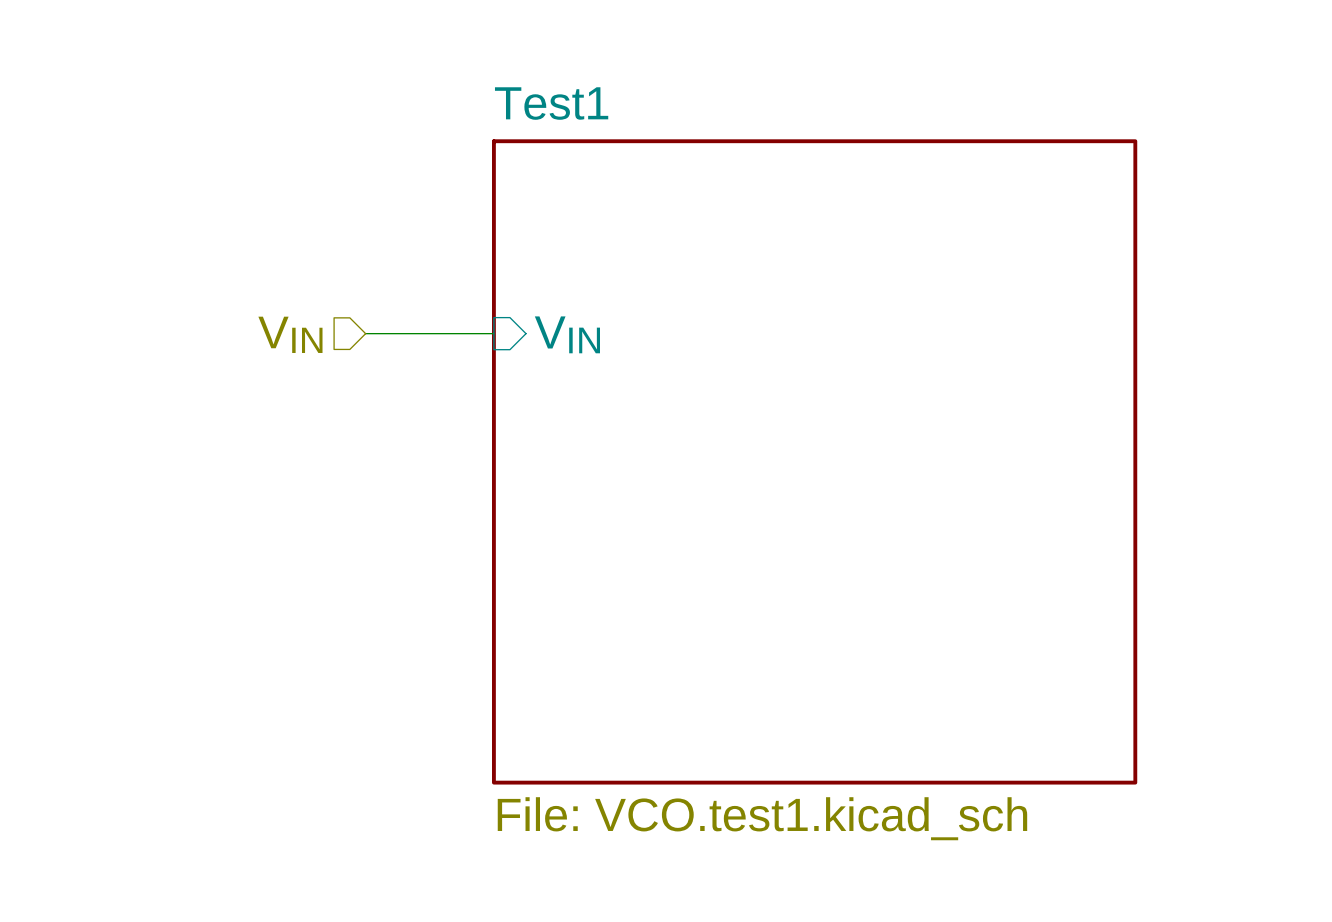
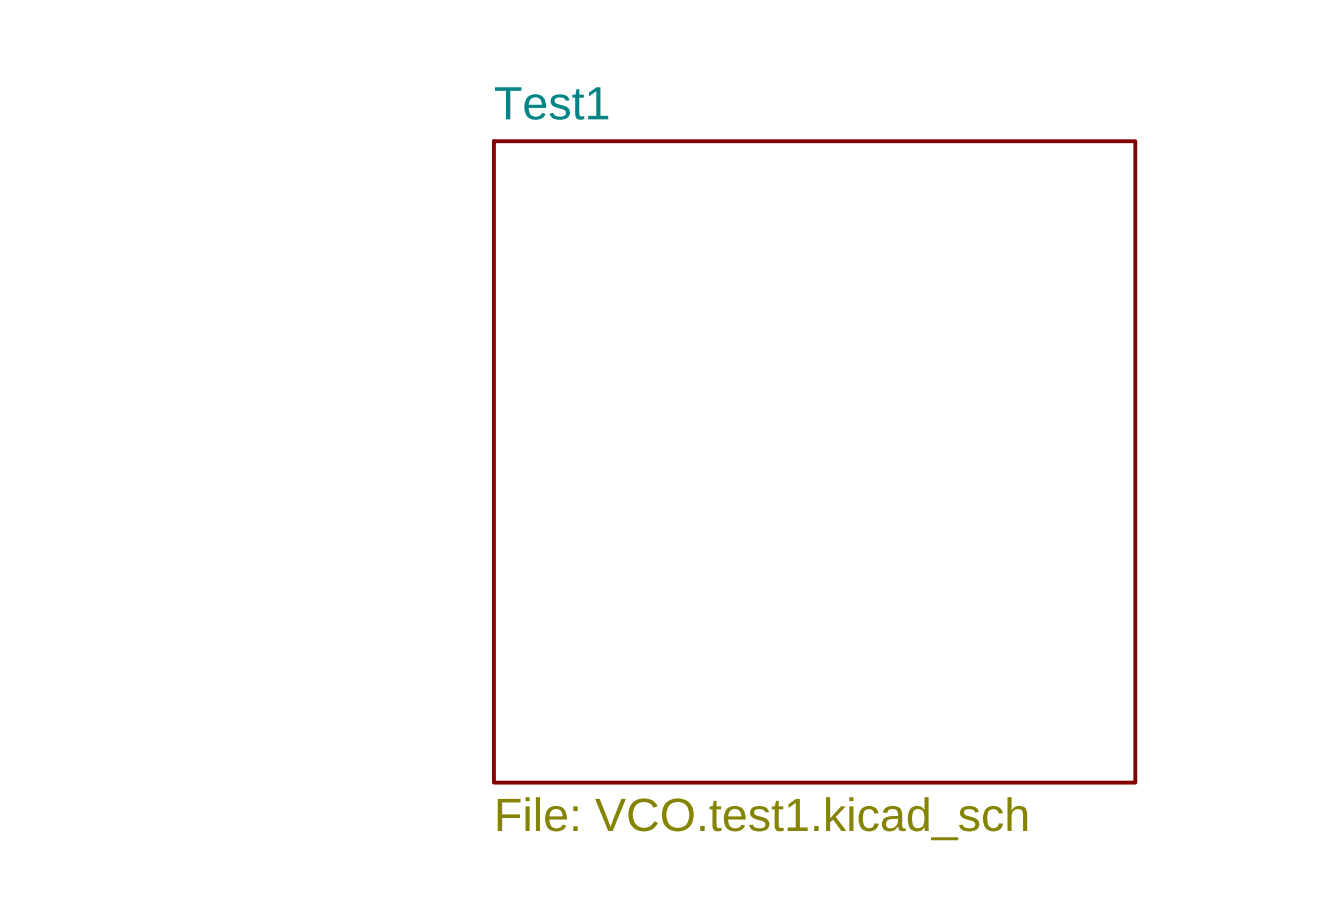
wire: (365, 333) (493, 333) -> none
hierarchical label: VIN (290, 334) -> none
sheet pin: VIN (567, 334) -> none

